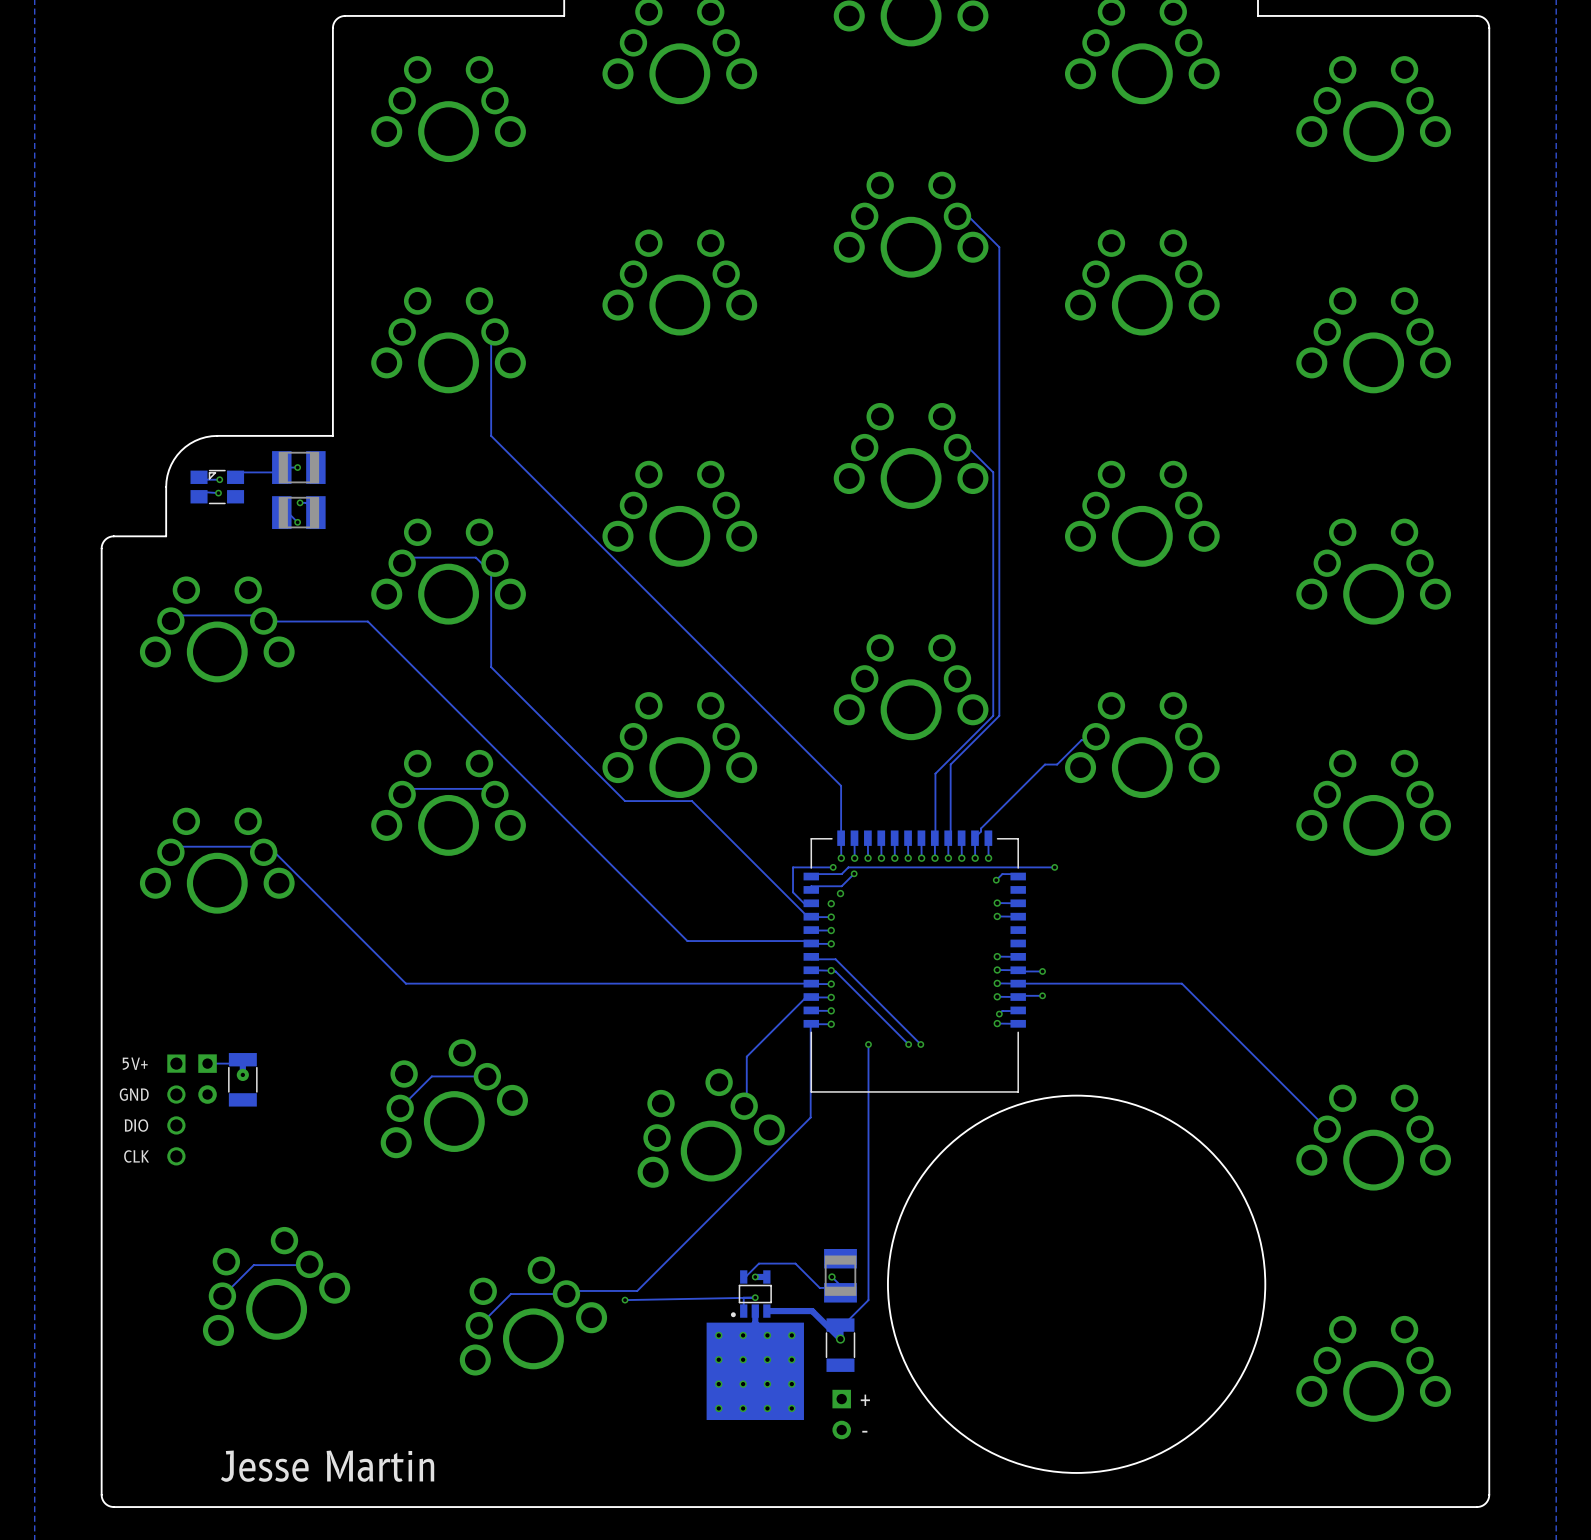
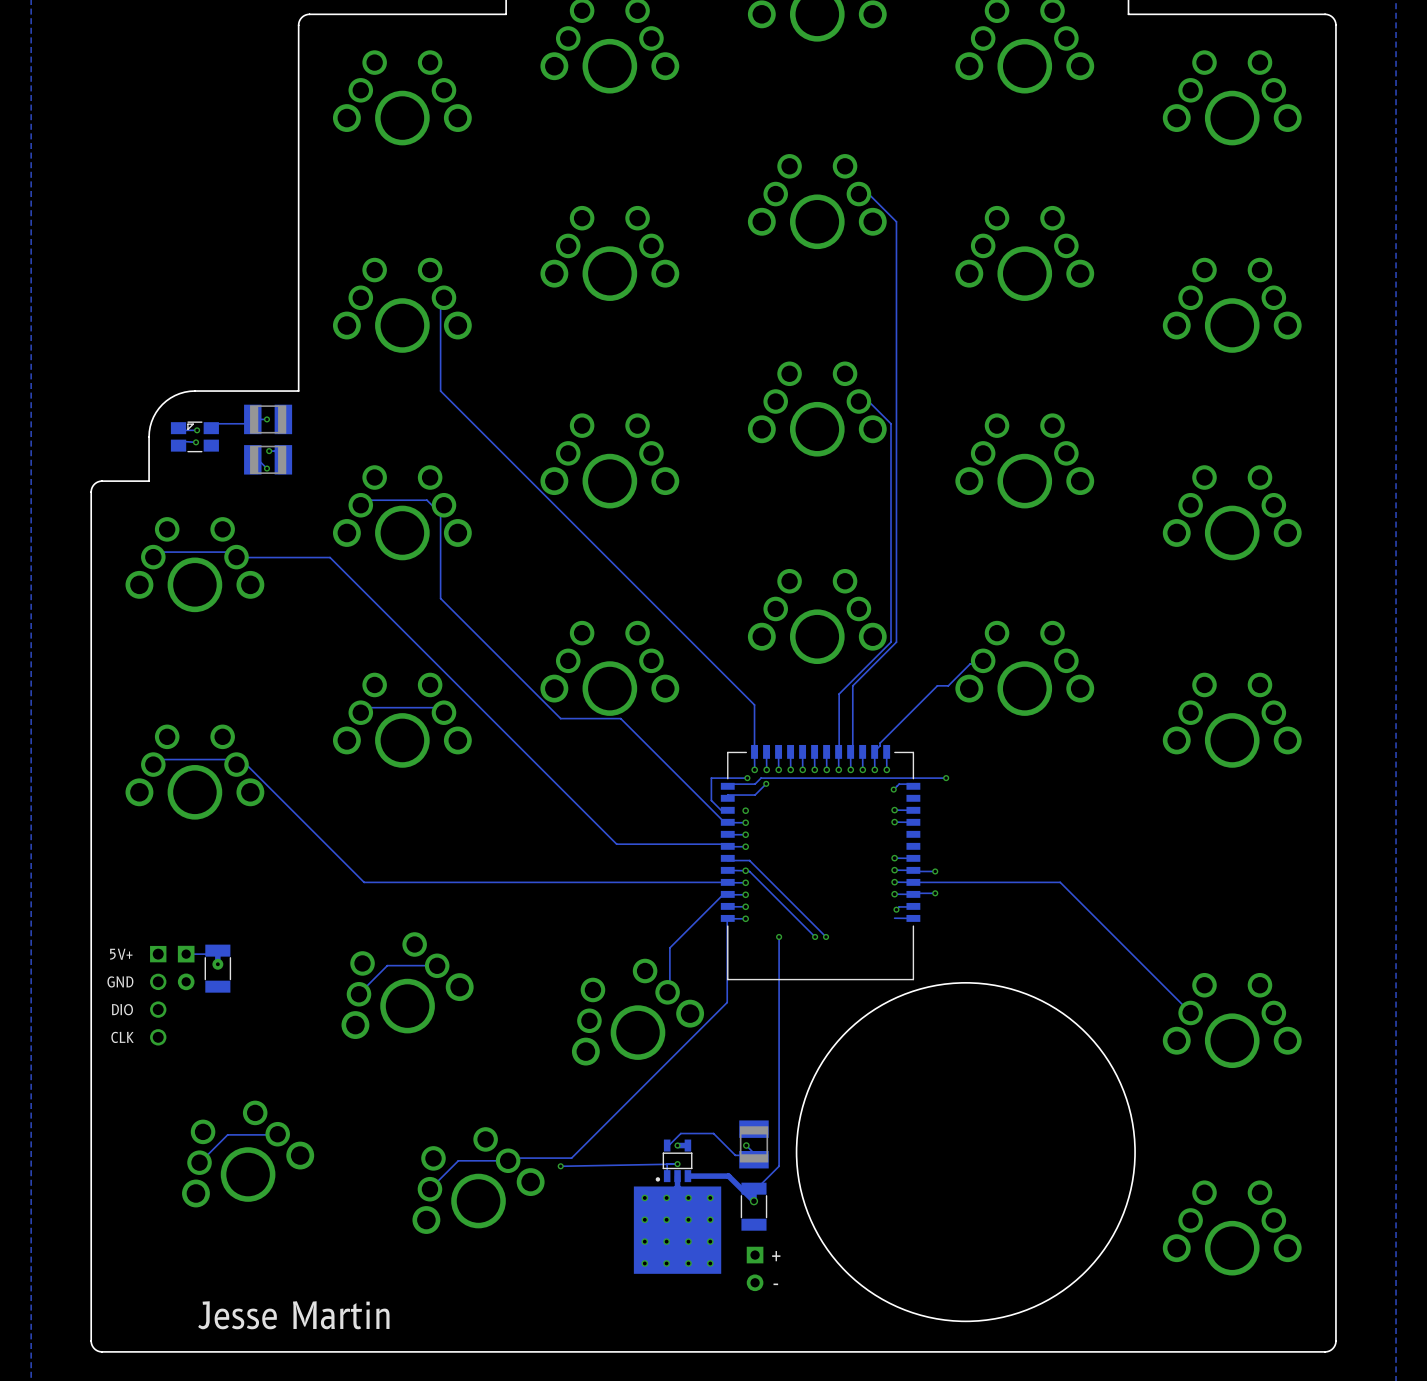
via: (840, 893) -> none
via: (997, 1023) -> none

